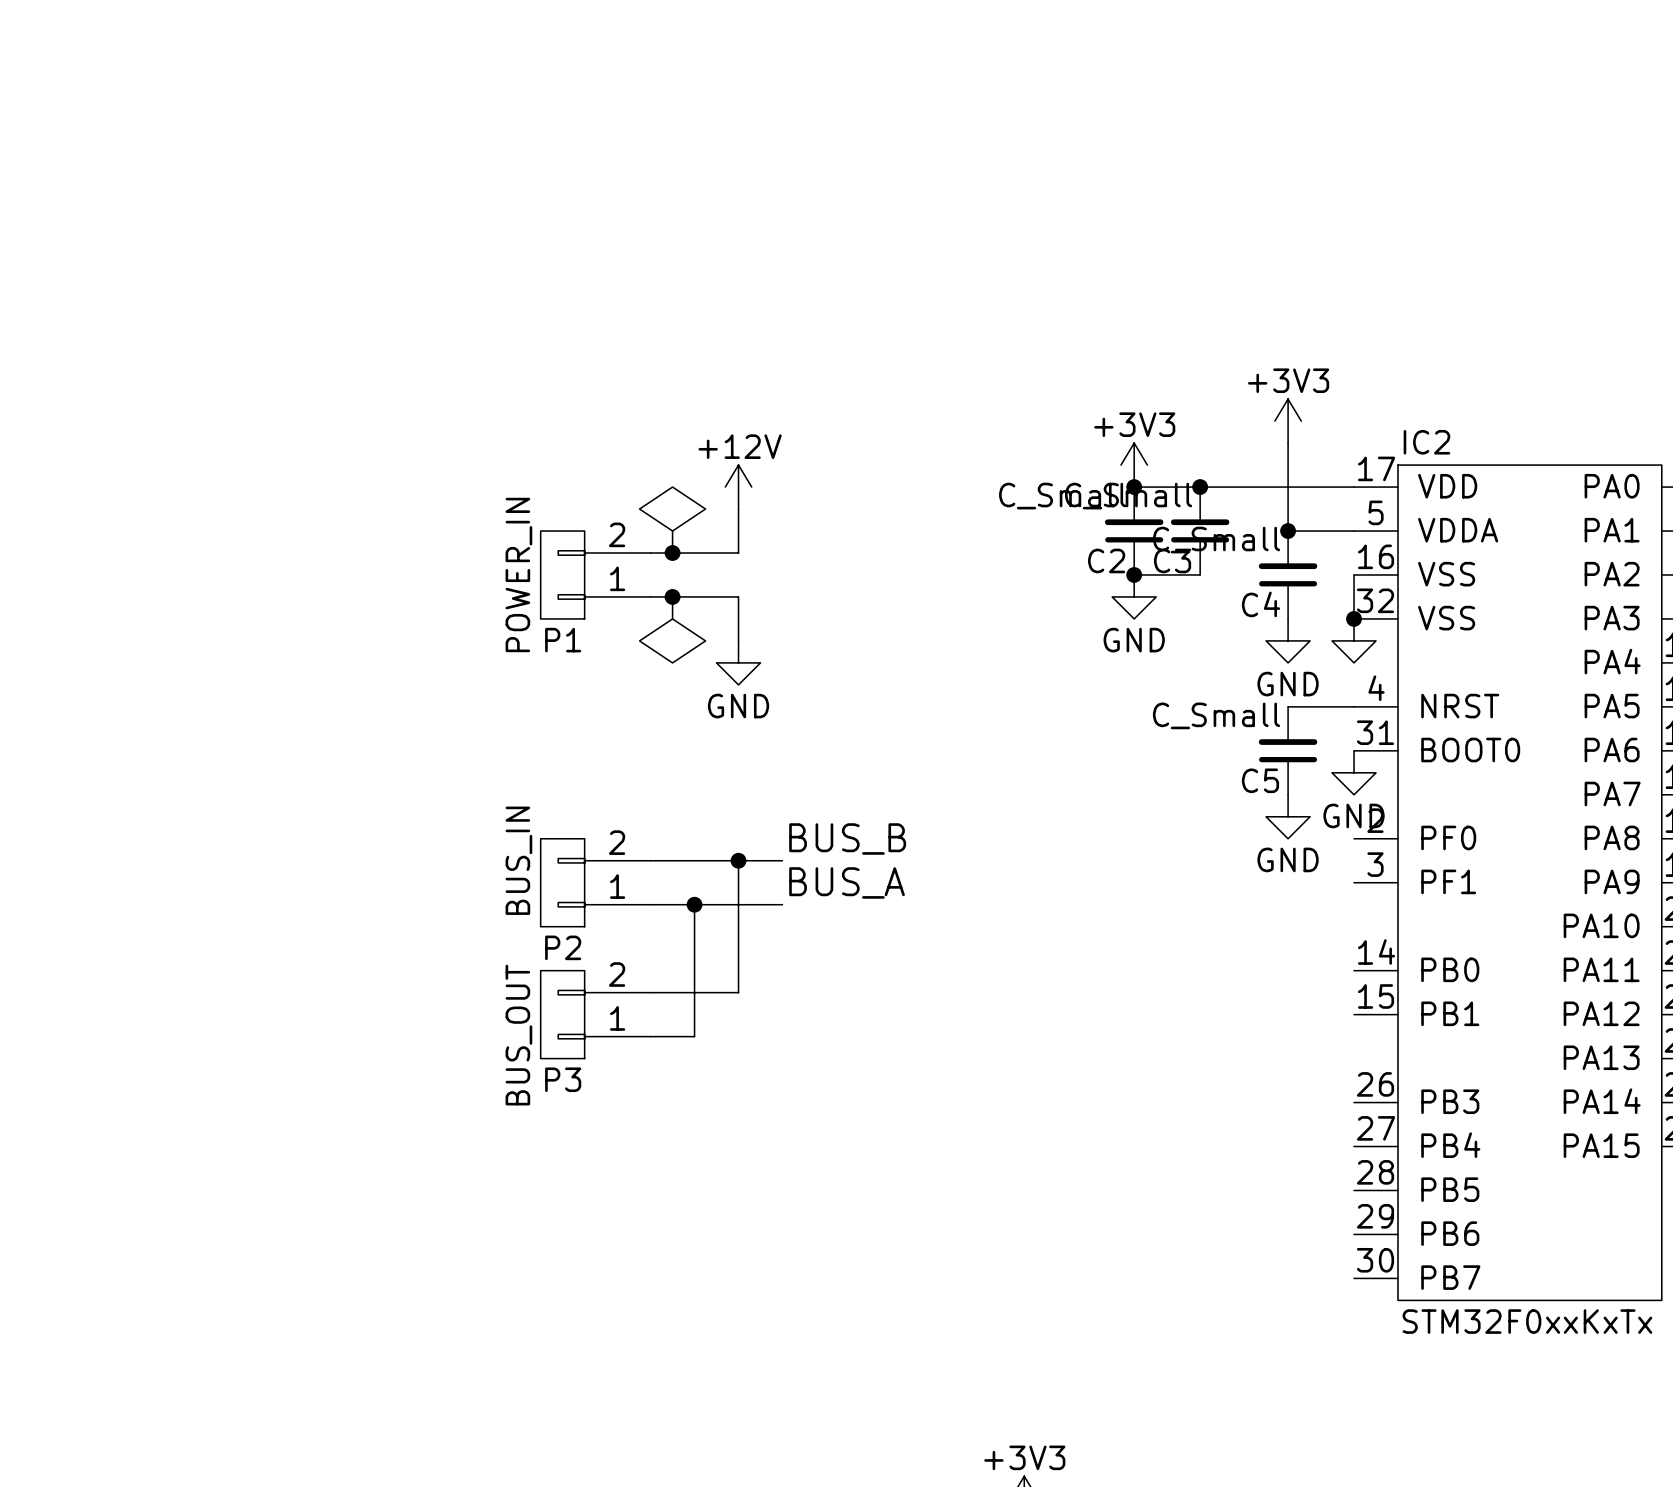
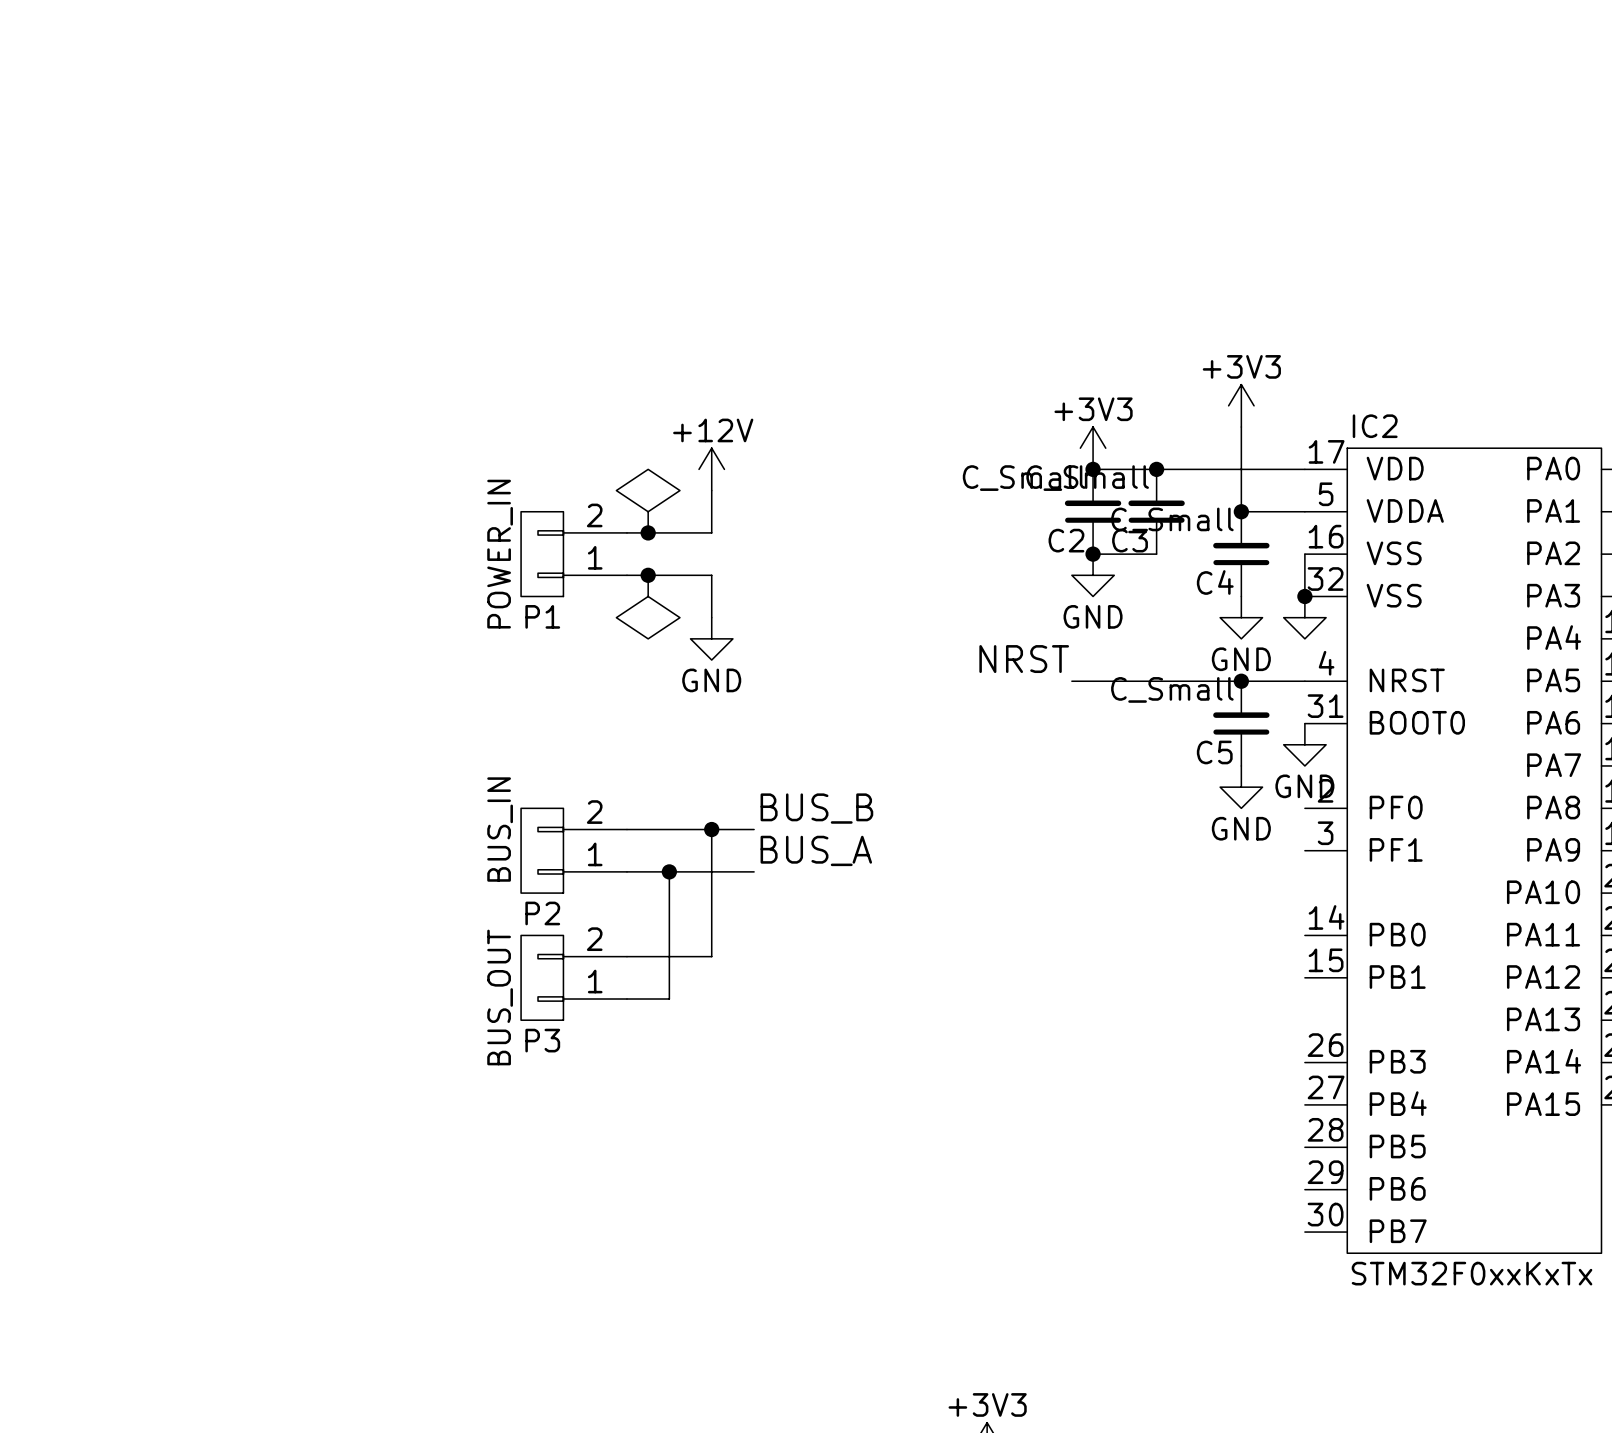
label: none -> NRST (1024, 659)
wire: none -> (1071, 681) (1241, 681)
junction: none -> (1241, 681)

